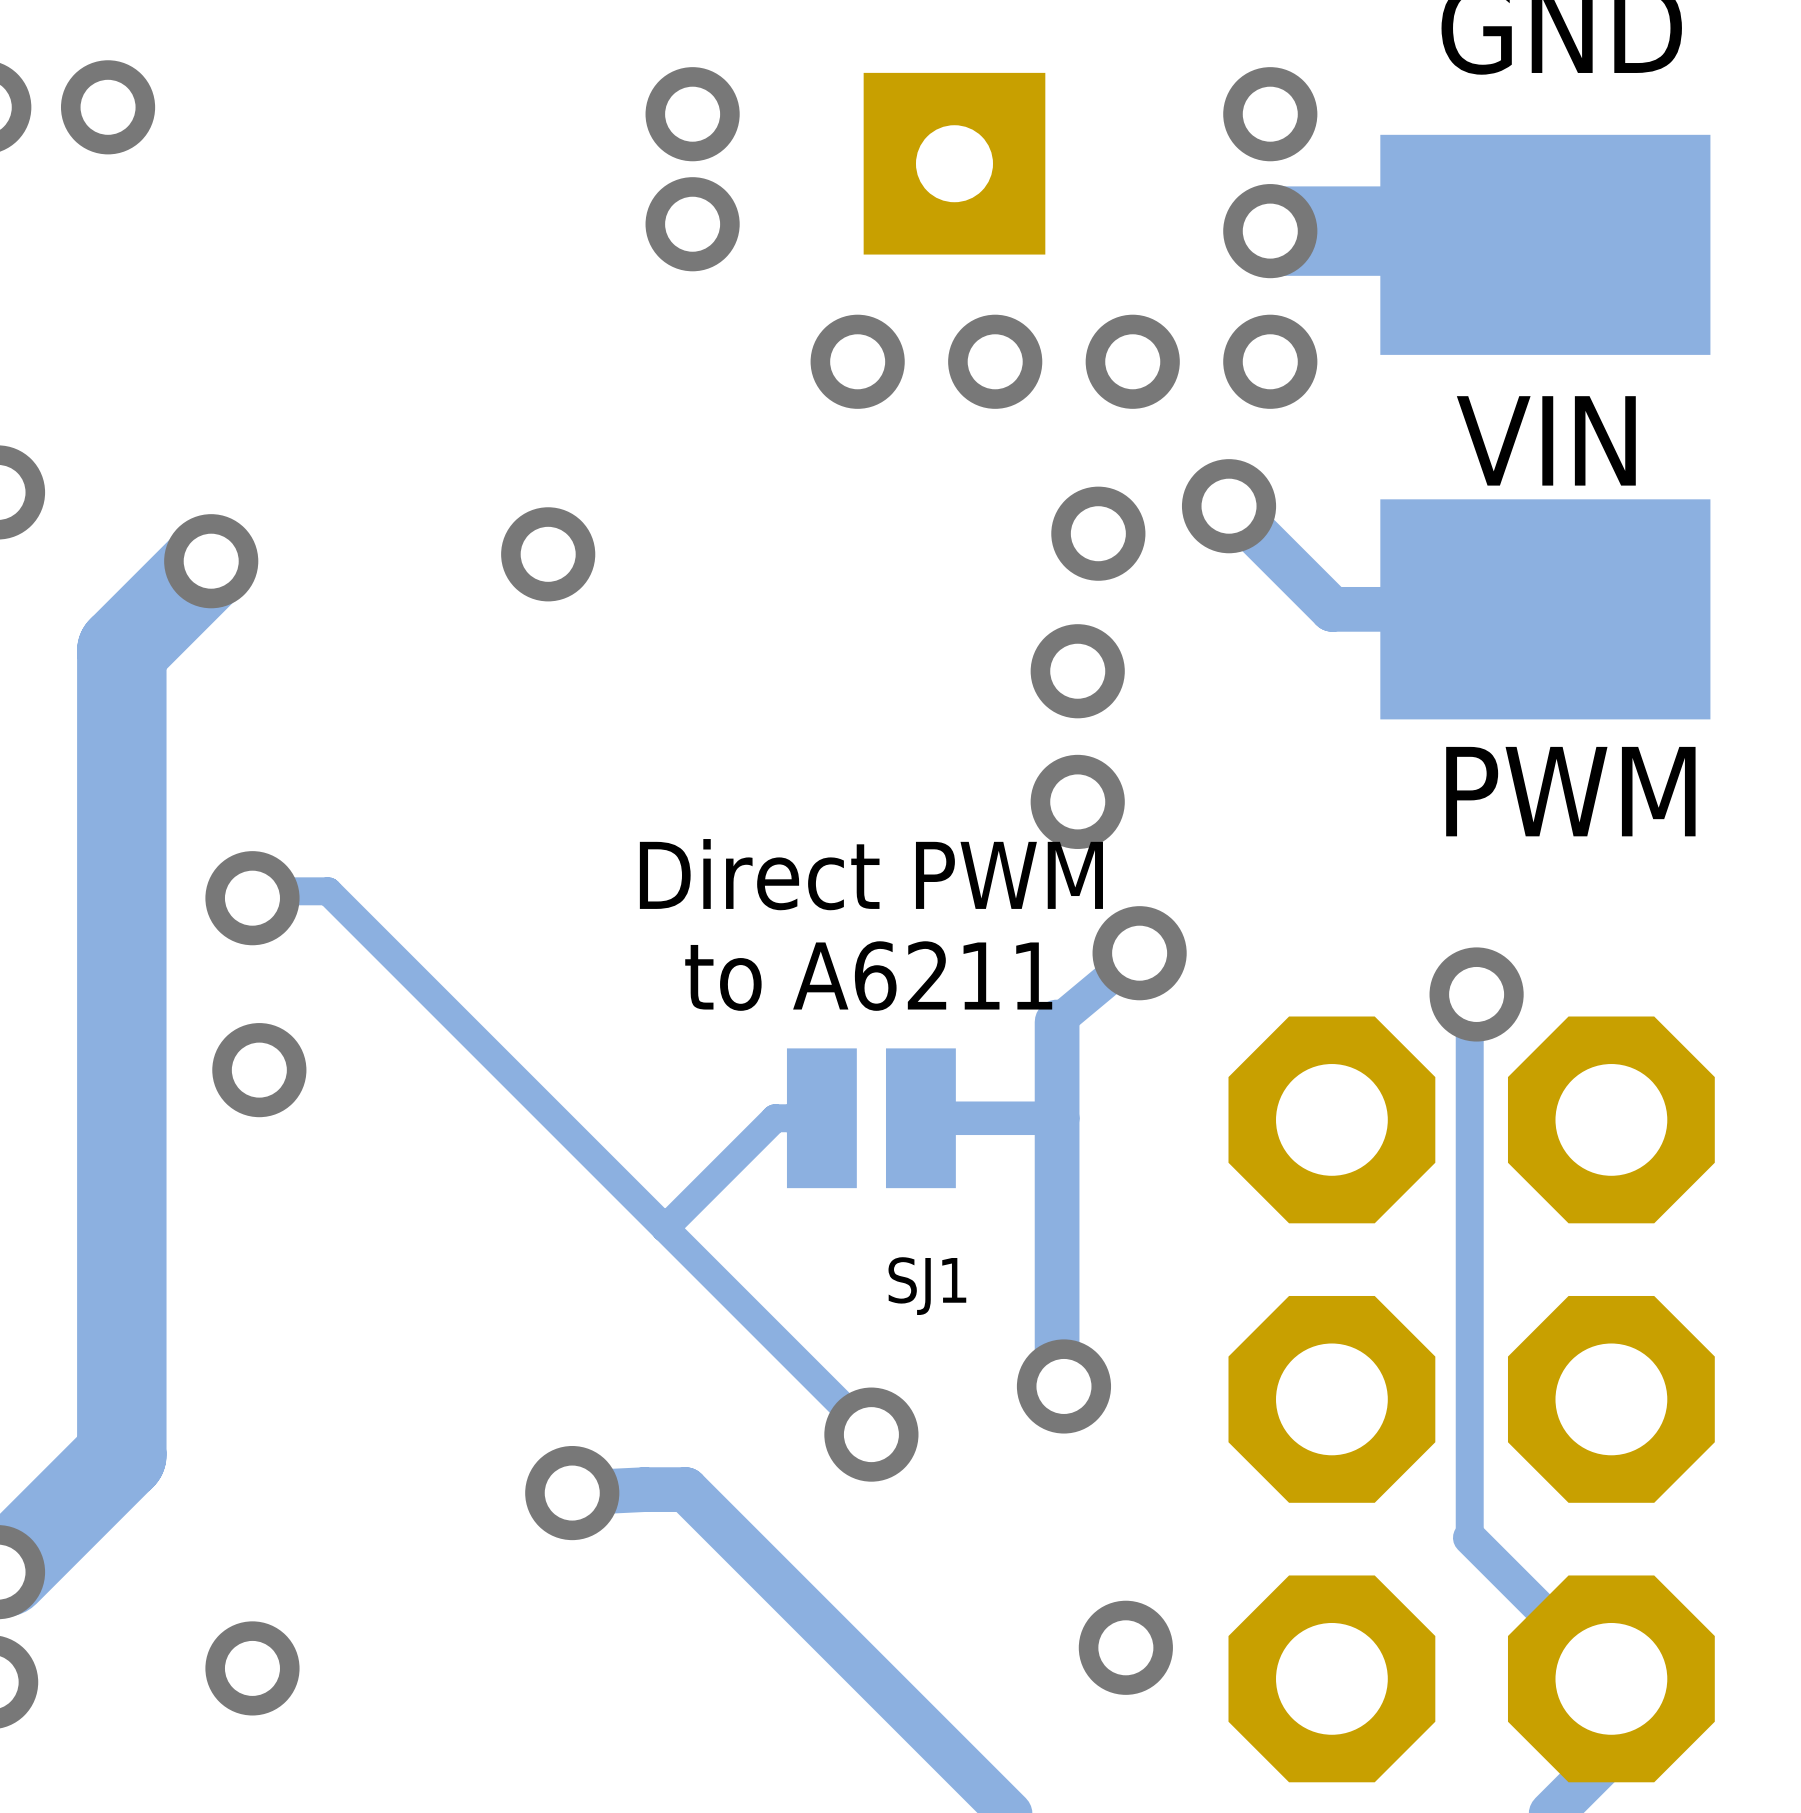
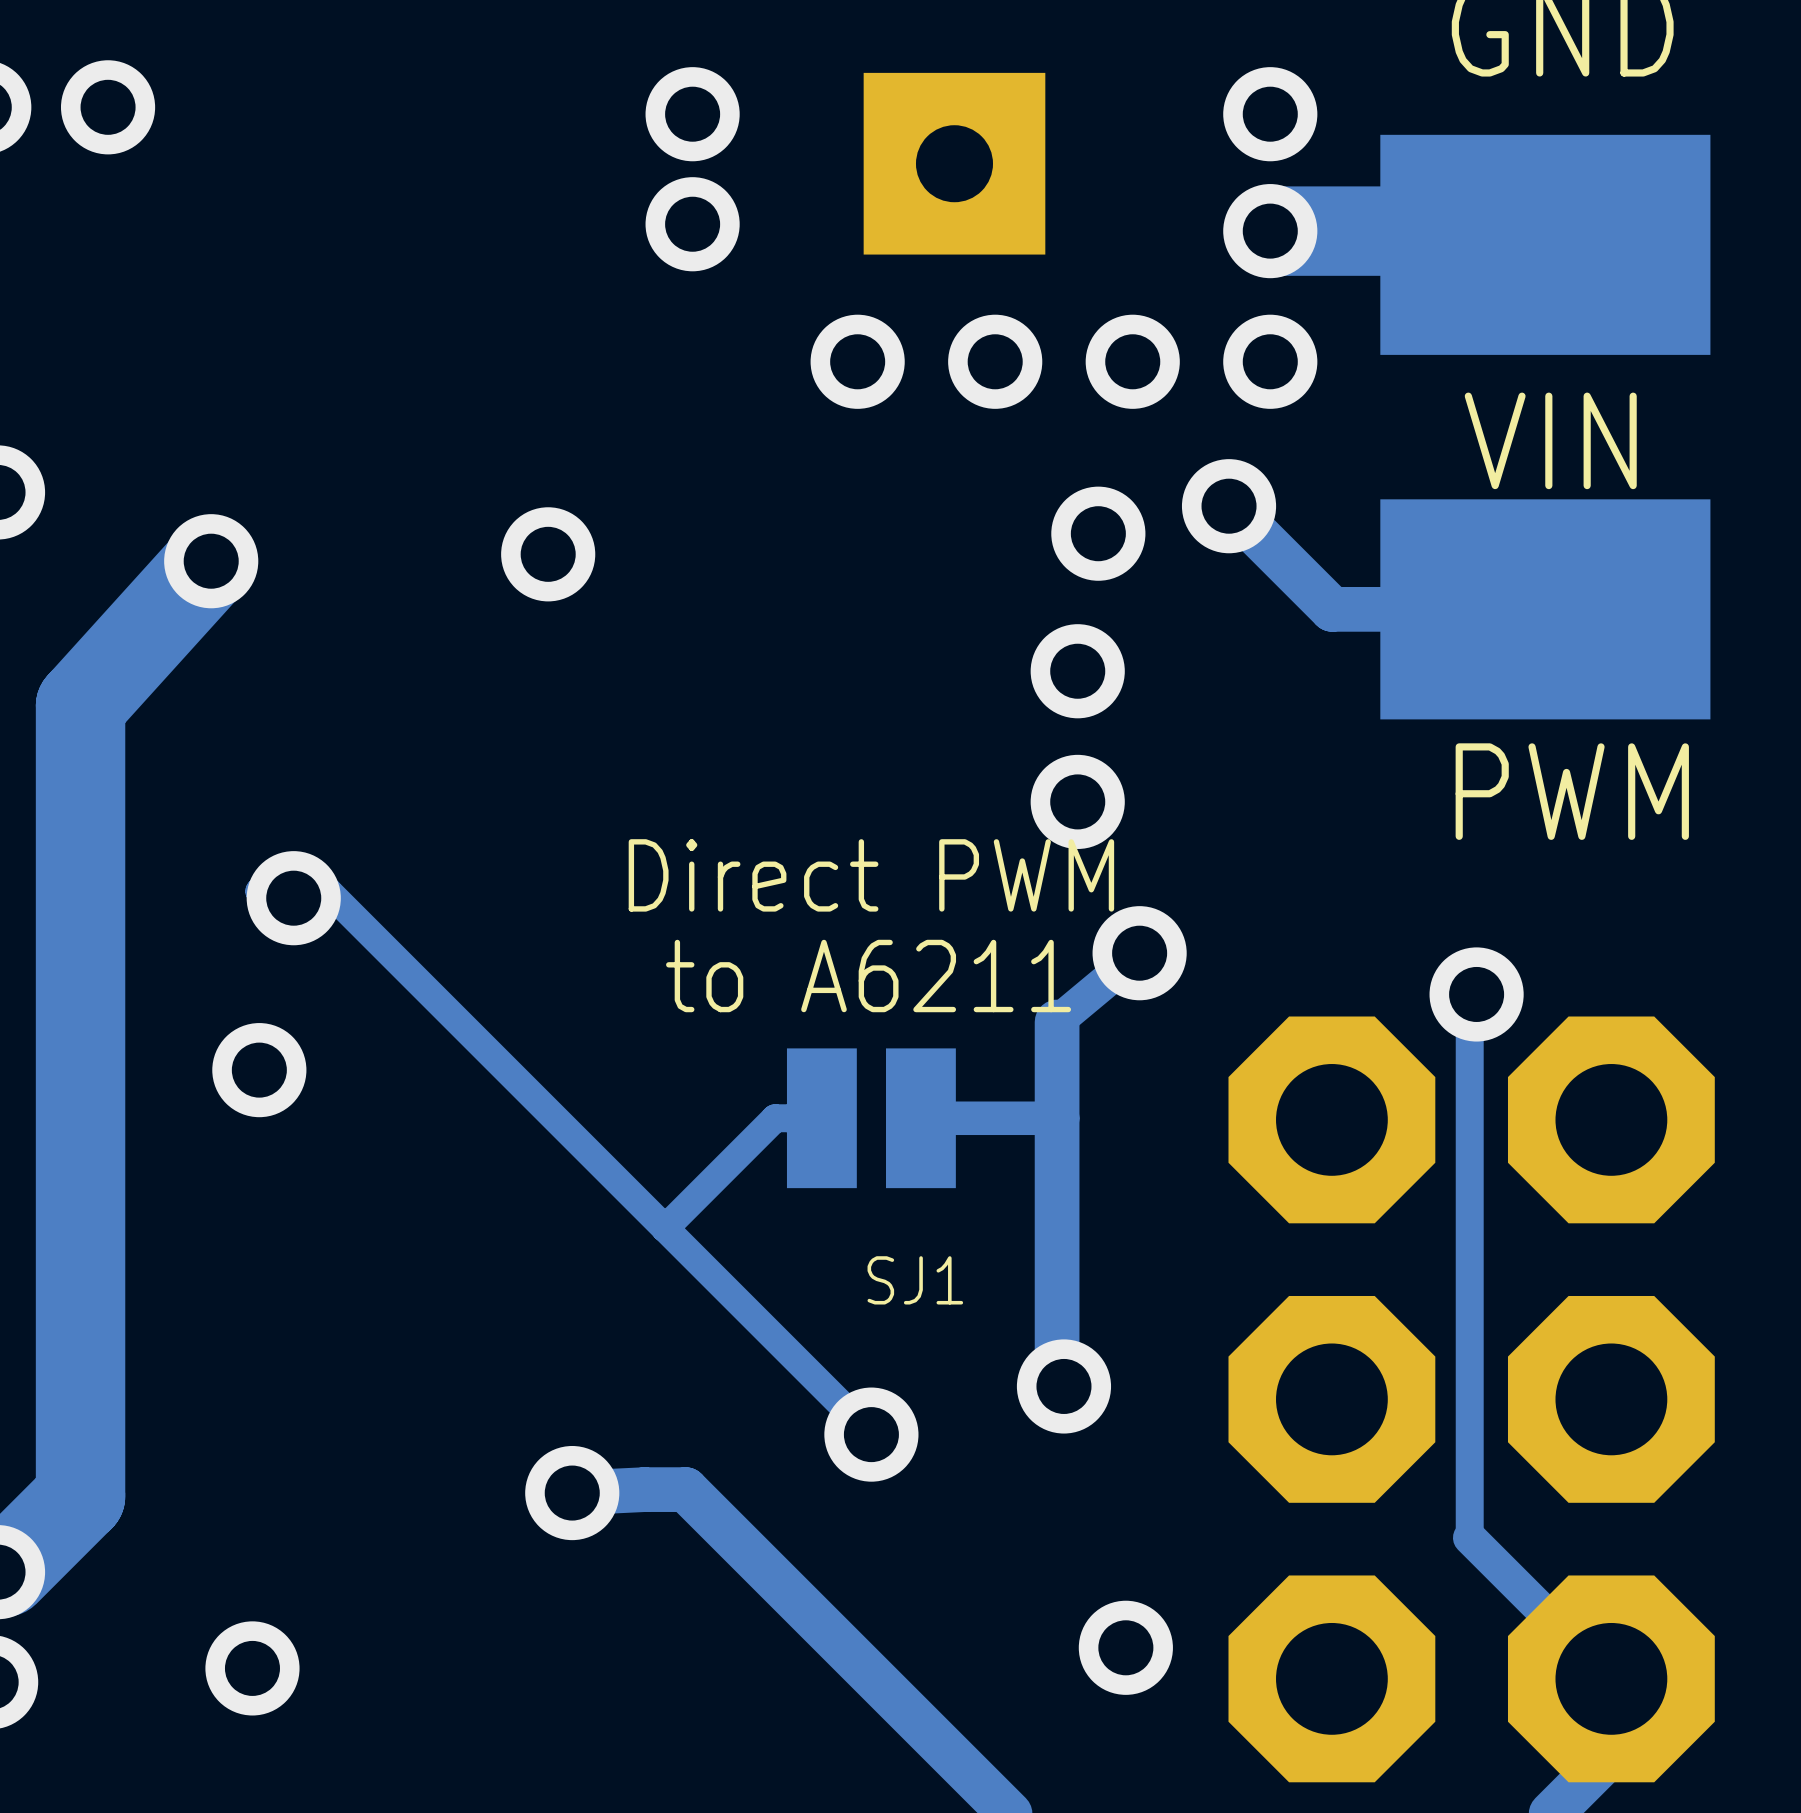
track: (211, 561) (121, 650) (121, 1455) (80, 1496) -> (211, 561) (80, 705) (80, 1496)
via position: (252, 898) -> (293, 898)

